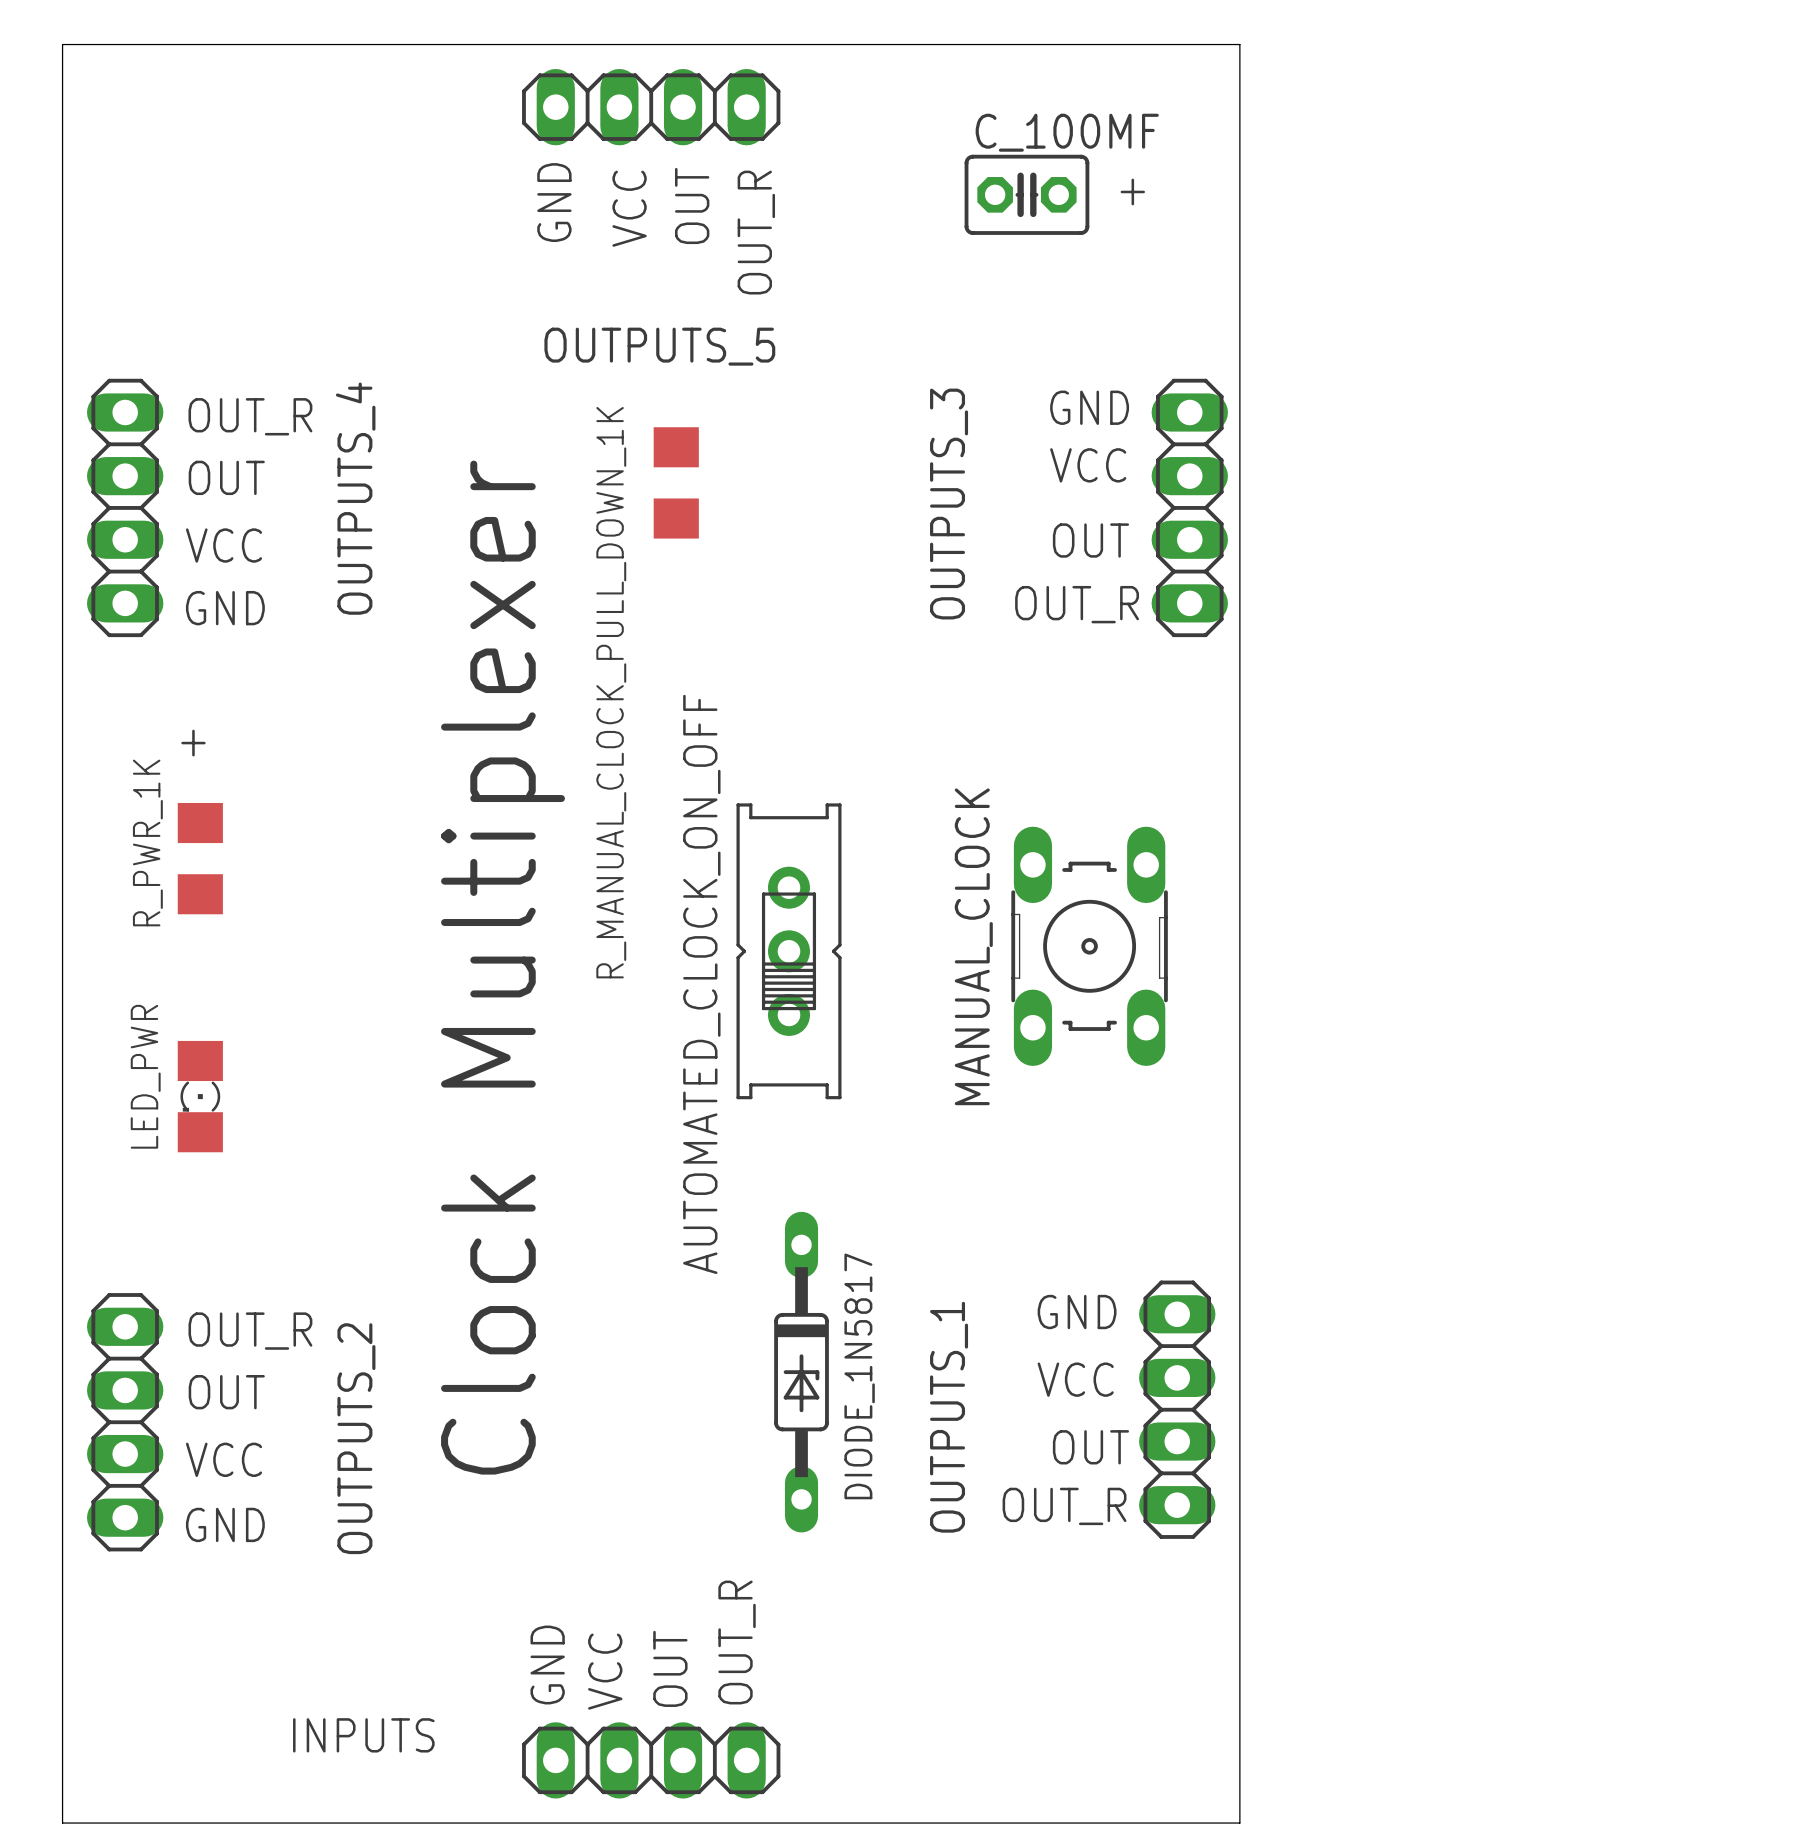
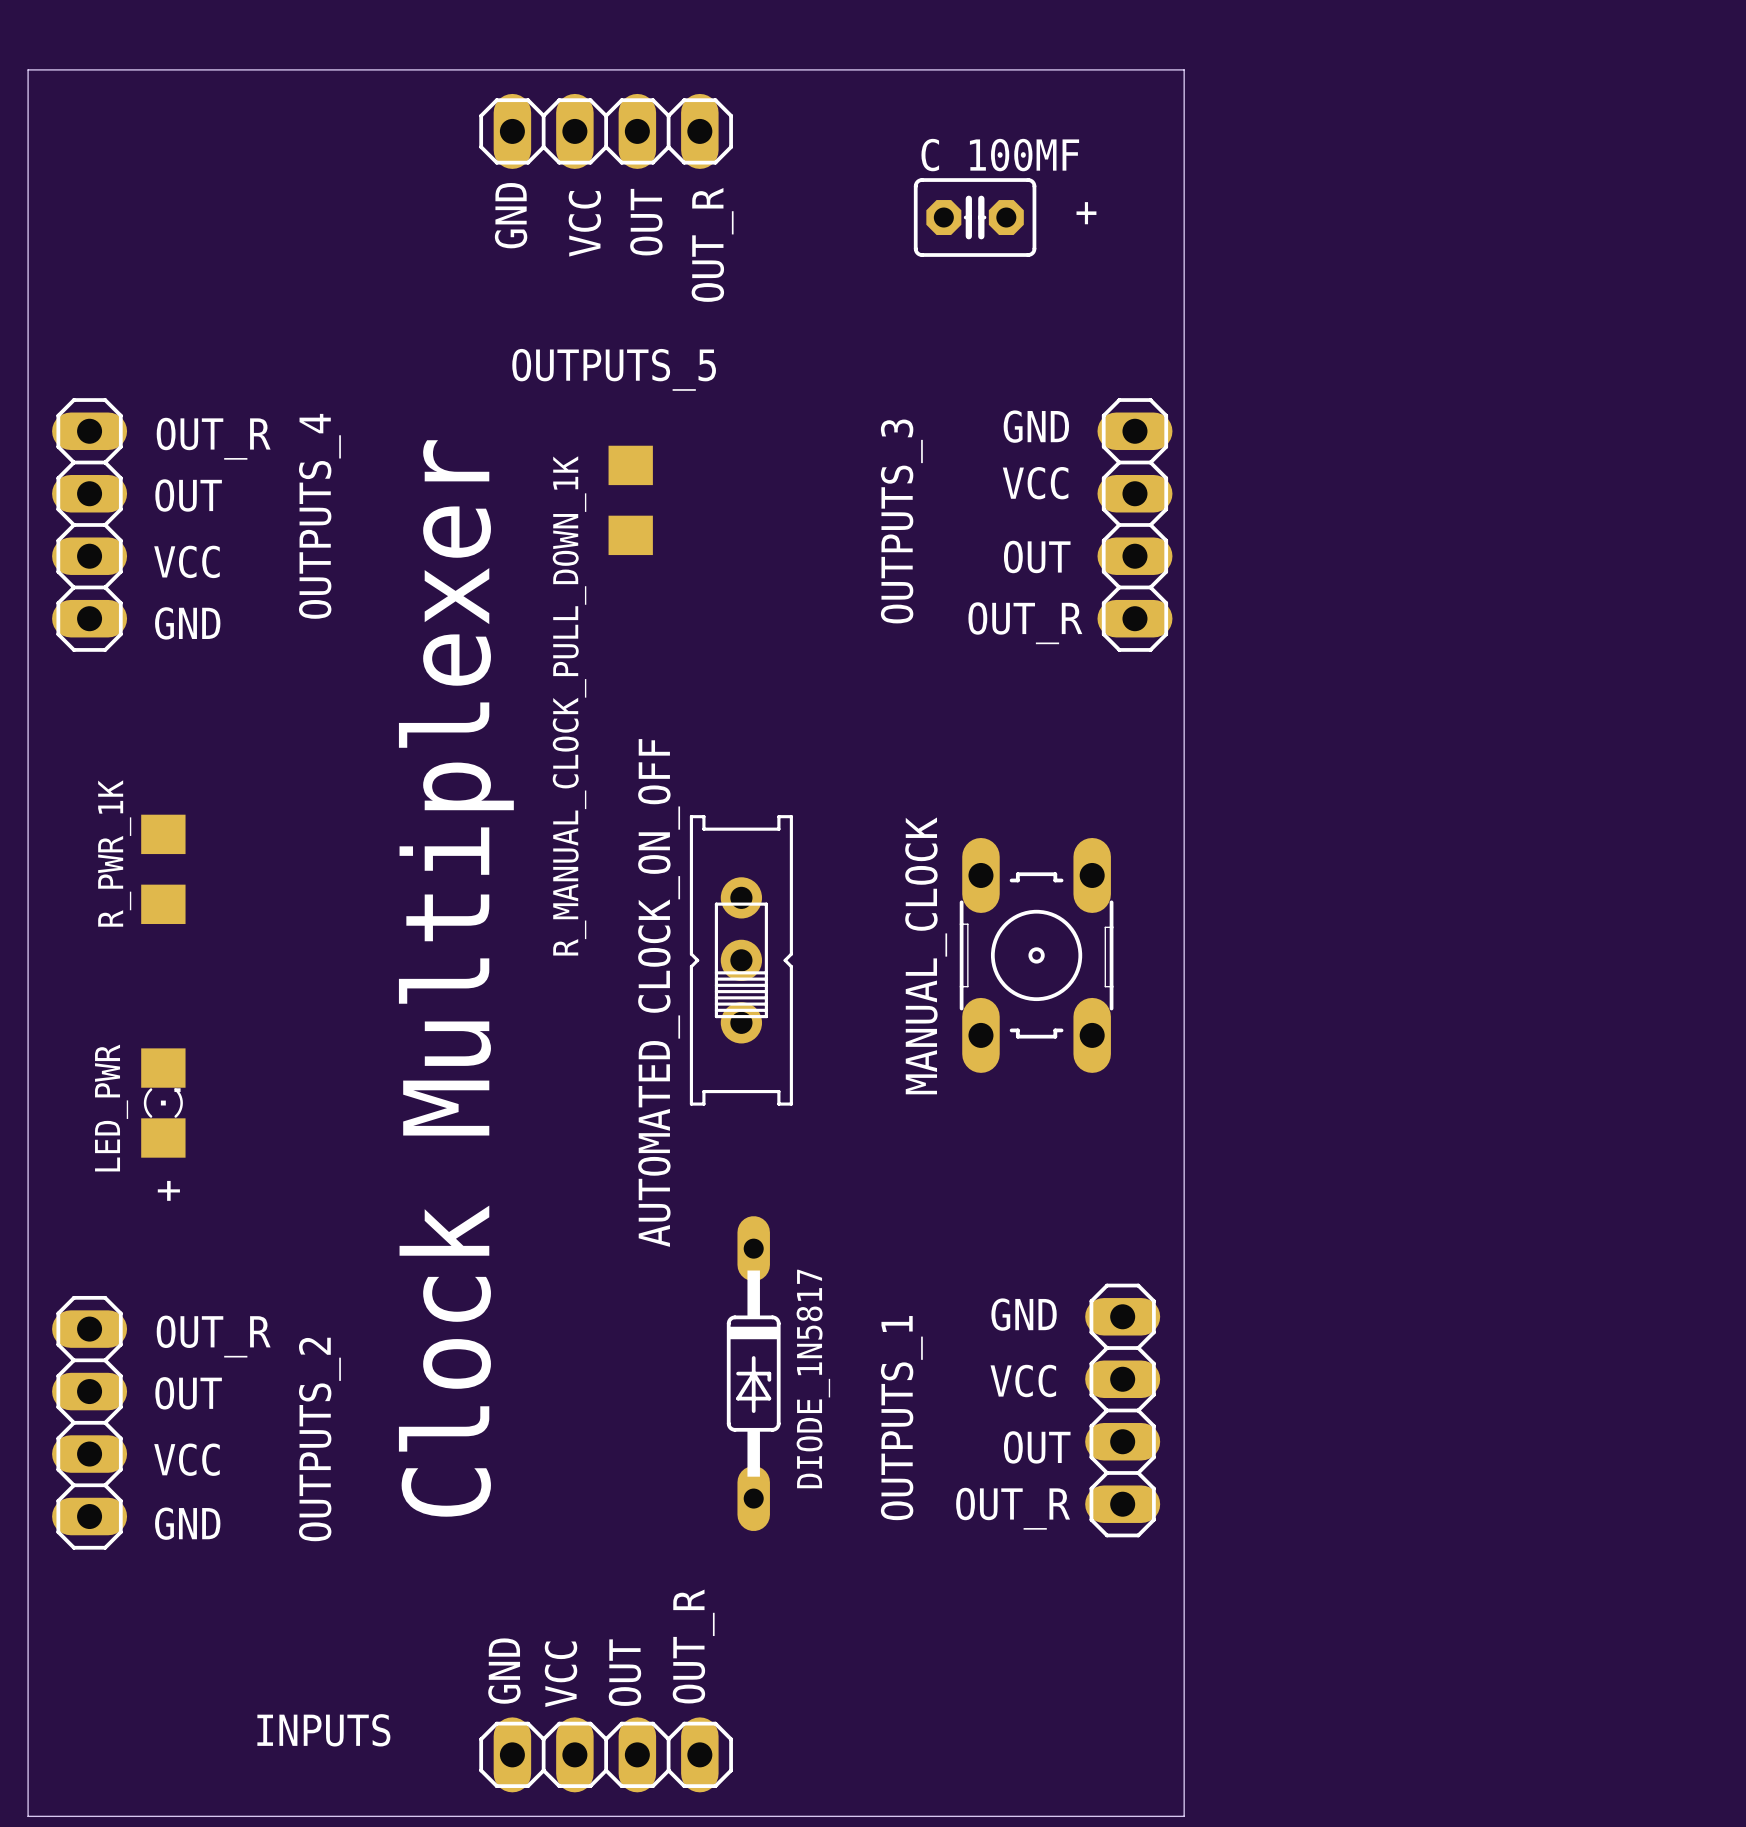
text rotation: 0° (193, 743) -> 90° counterclockwise (168, 1190)
text position: + (193, 743) -> + (168, 1190)
LED_PWR rotation: 0° (200, 1096) -> 180° (163, 1103)

